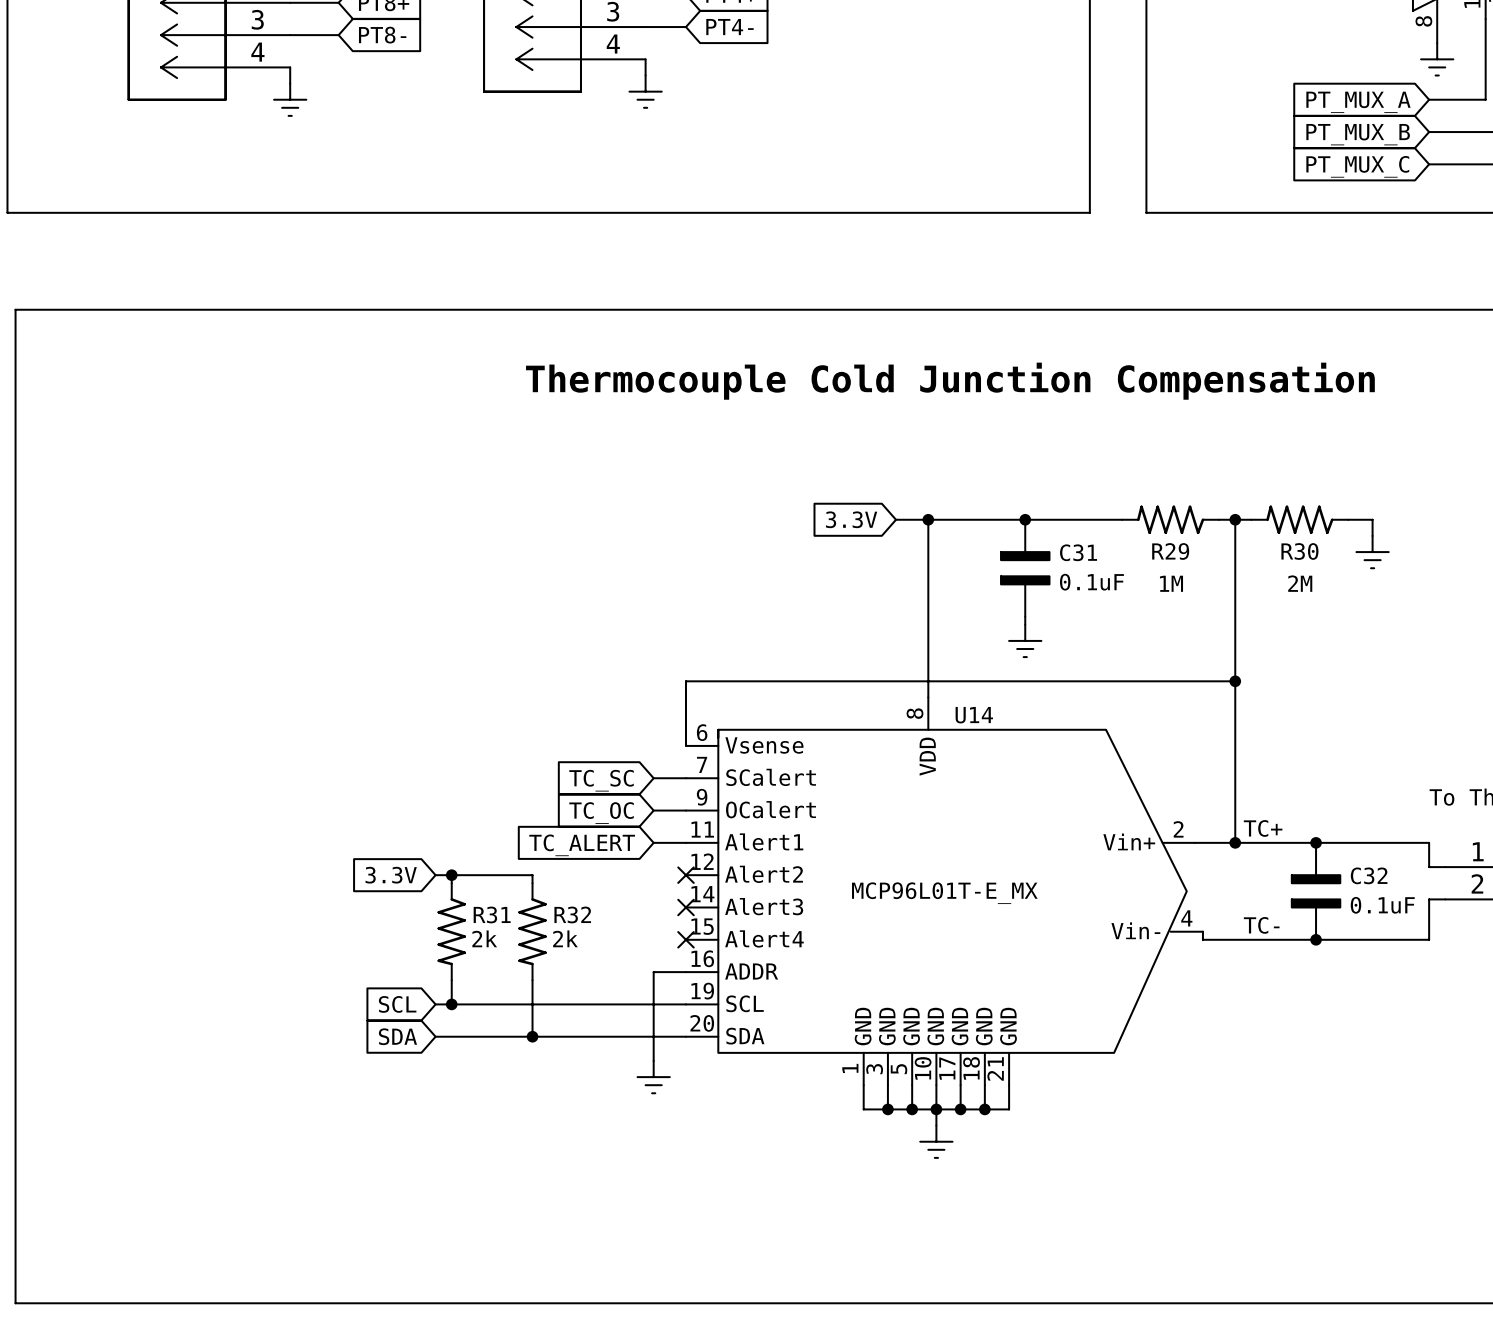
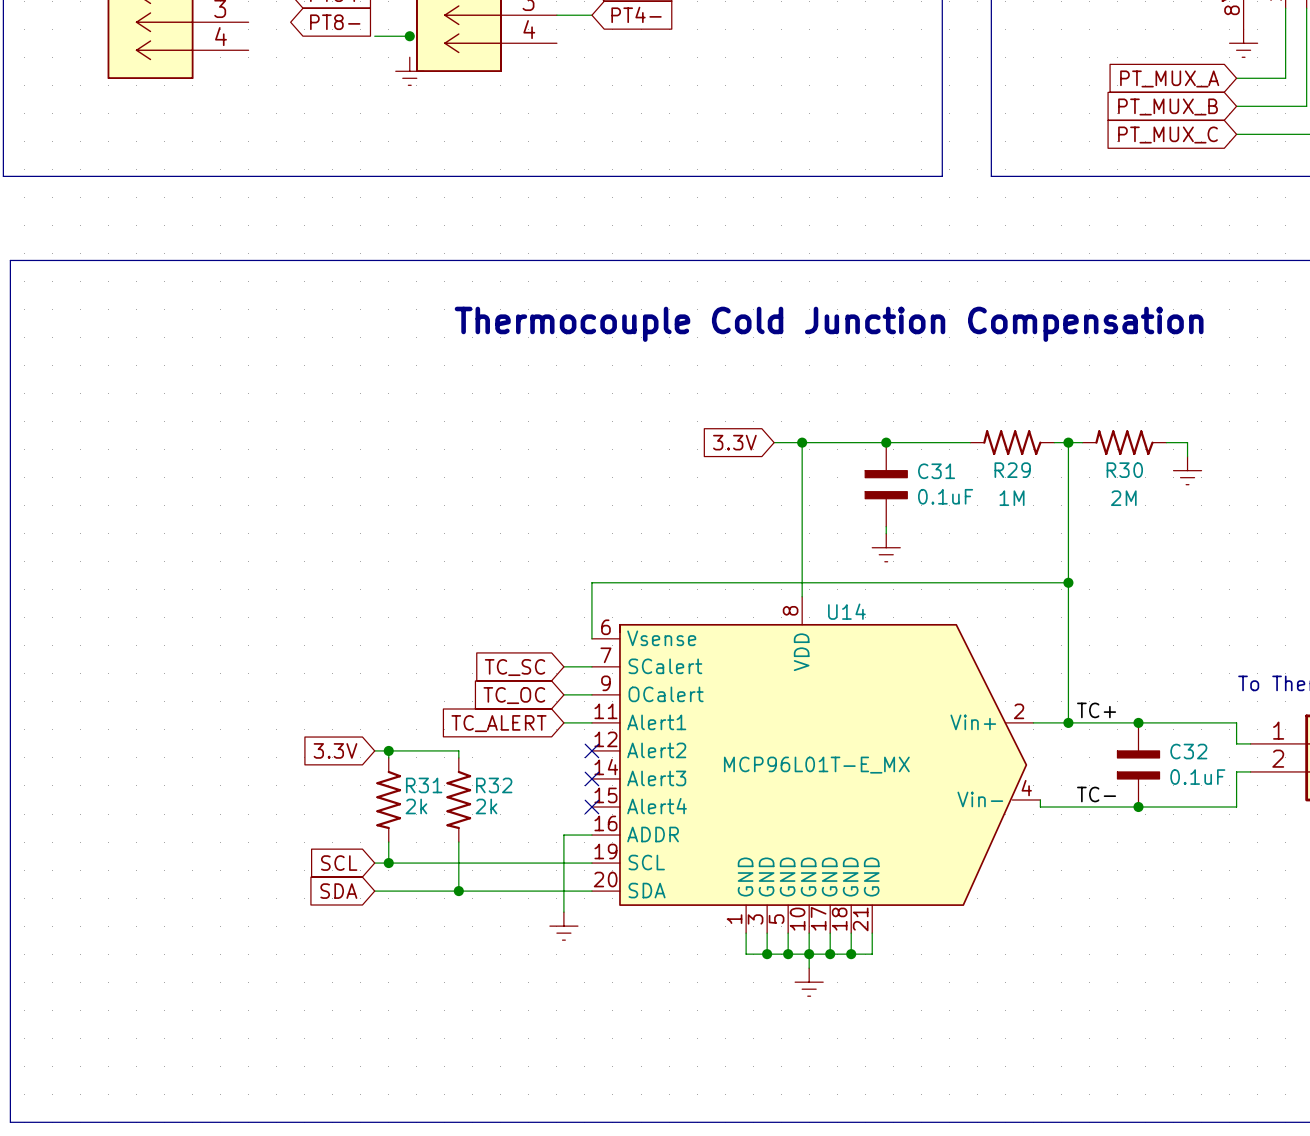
wire: (290, 35) (338, 35) -> none
wire: none -> (374, 36) (409, 36)
junction: none -> (409, 36)
wire: (645, 59) (645, 75) -> none
wire: (290, 67) (290, 83) -> none
power symbol: none -> (409, 71)
power symbol: (645, 91) -> none
power symbol: (290, 99) -> none

